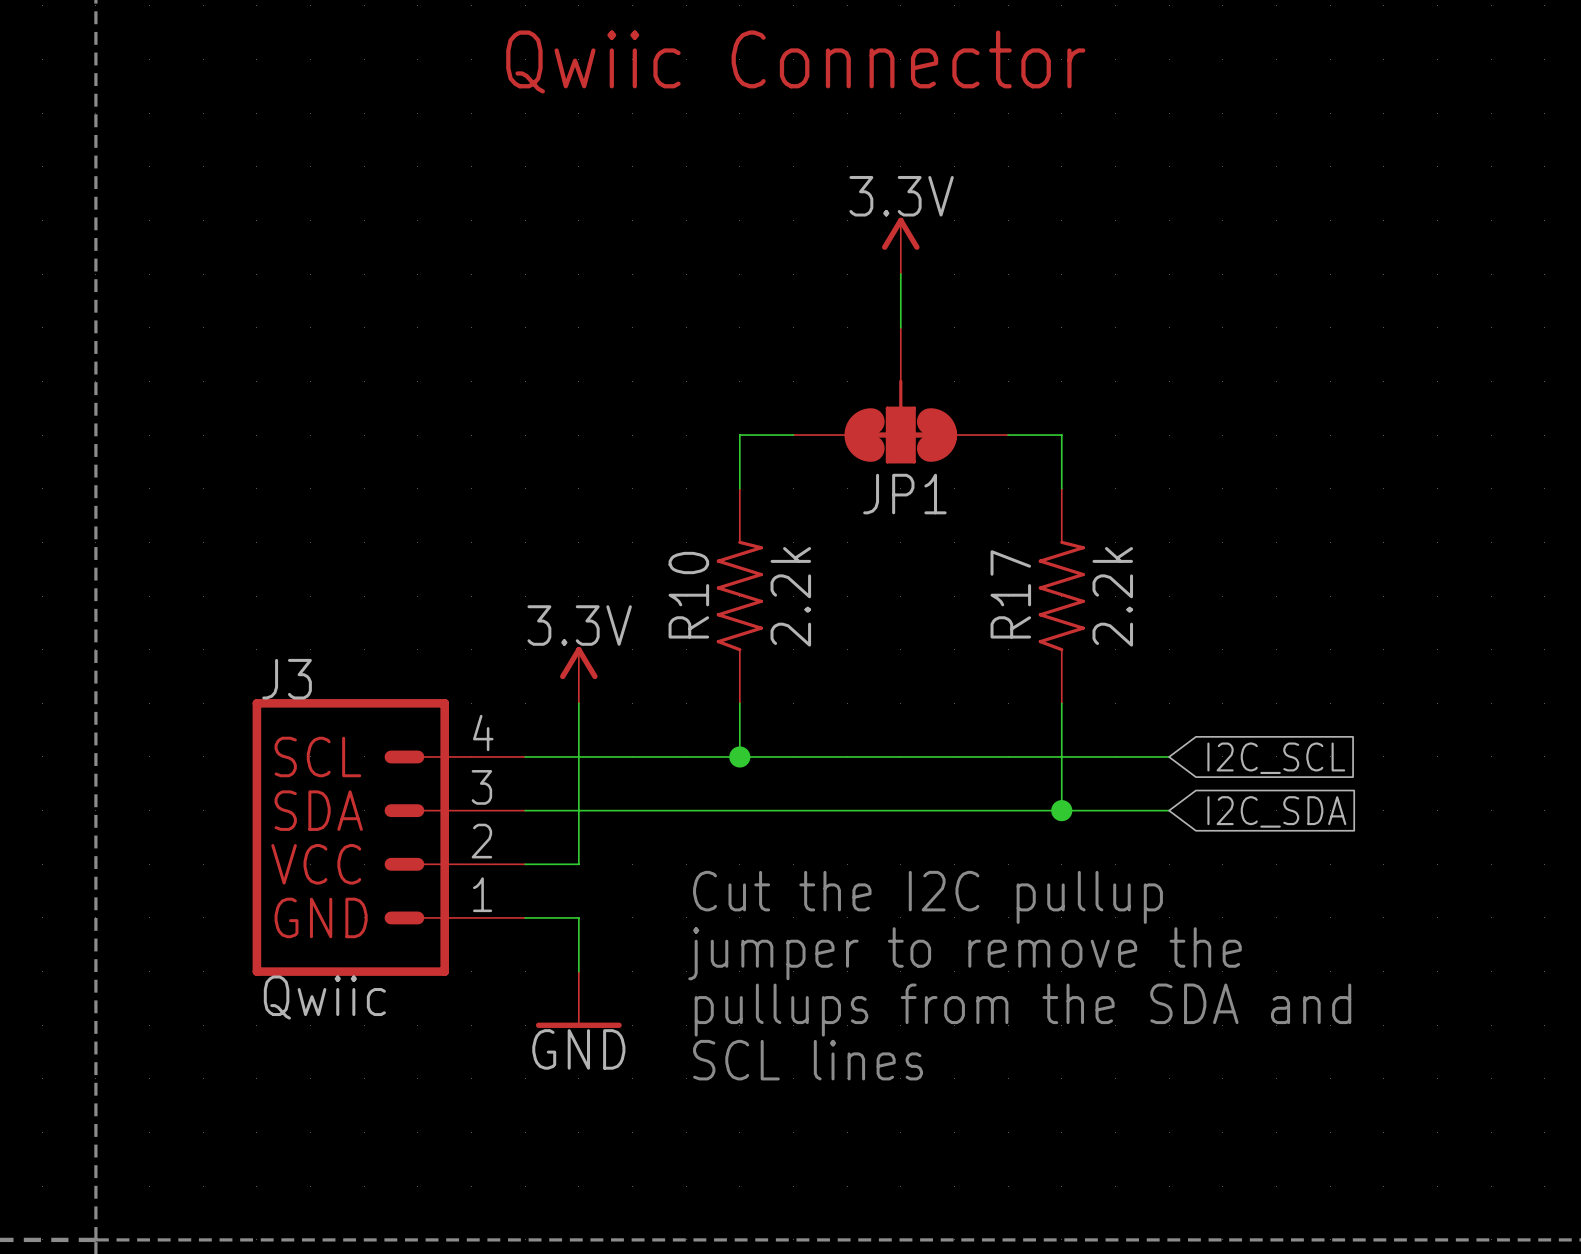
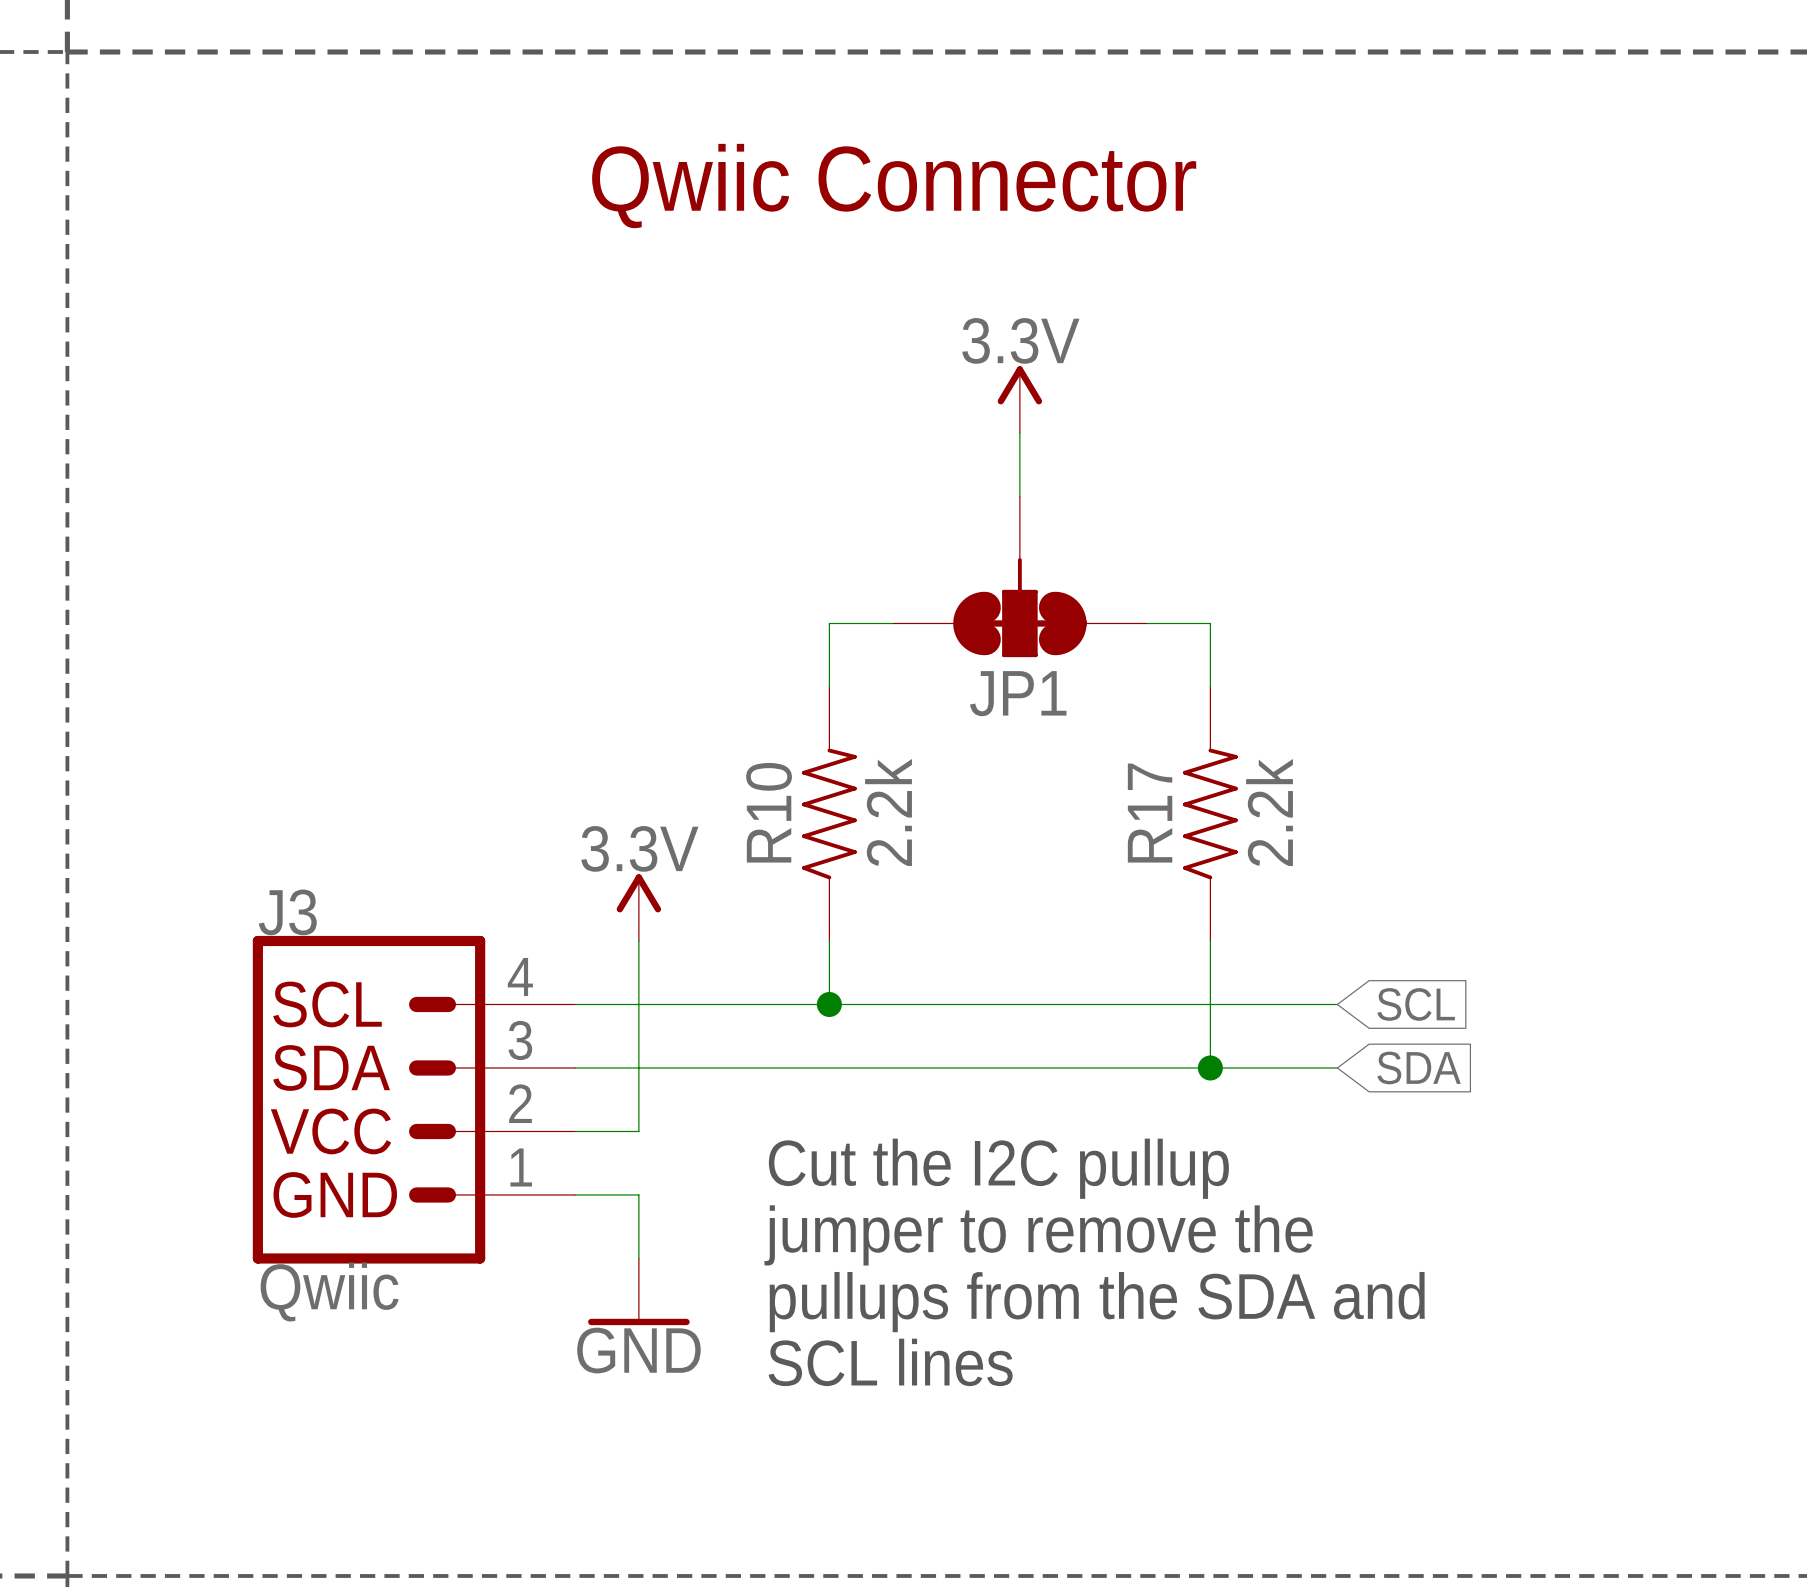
global label: I2C_SCL (1276, 758) -> SCL (1416, 1004)
global label: I2C_SDA (1276, 811) -> SDA (1419, 1067)

